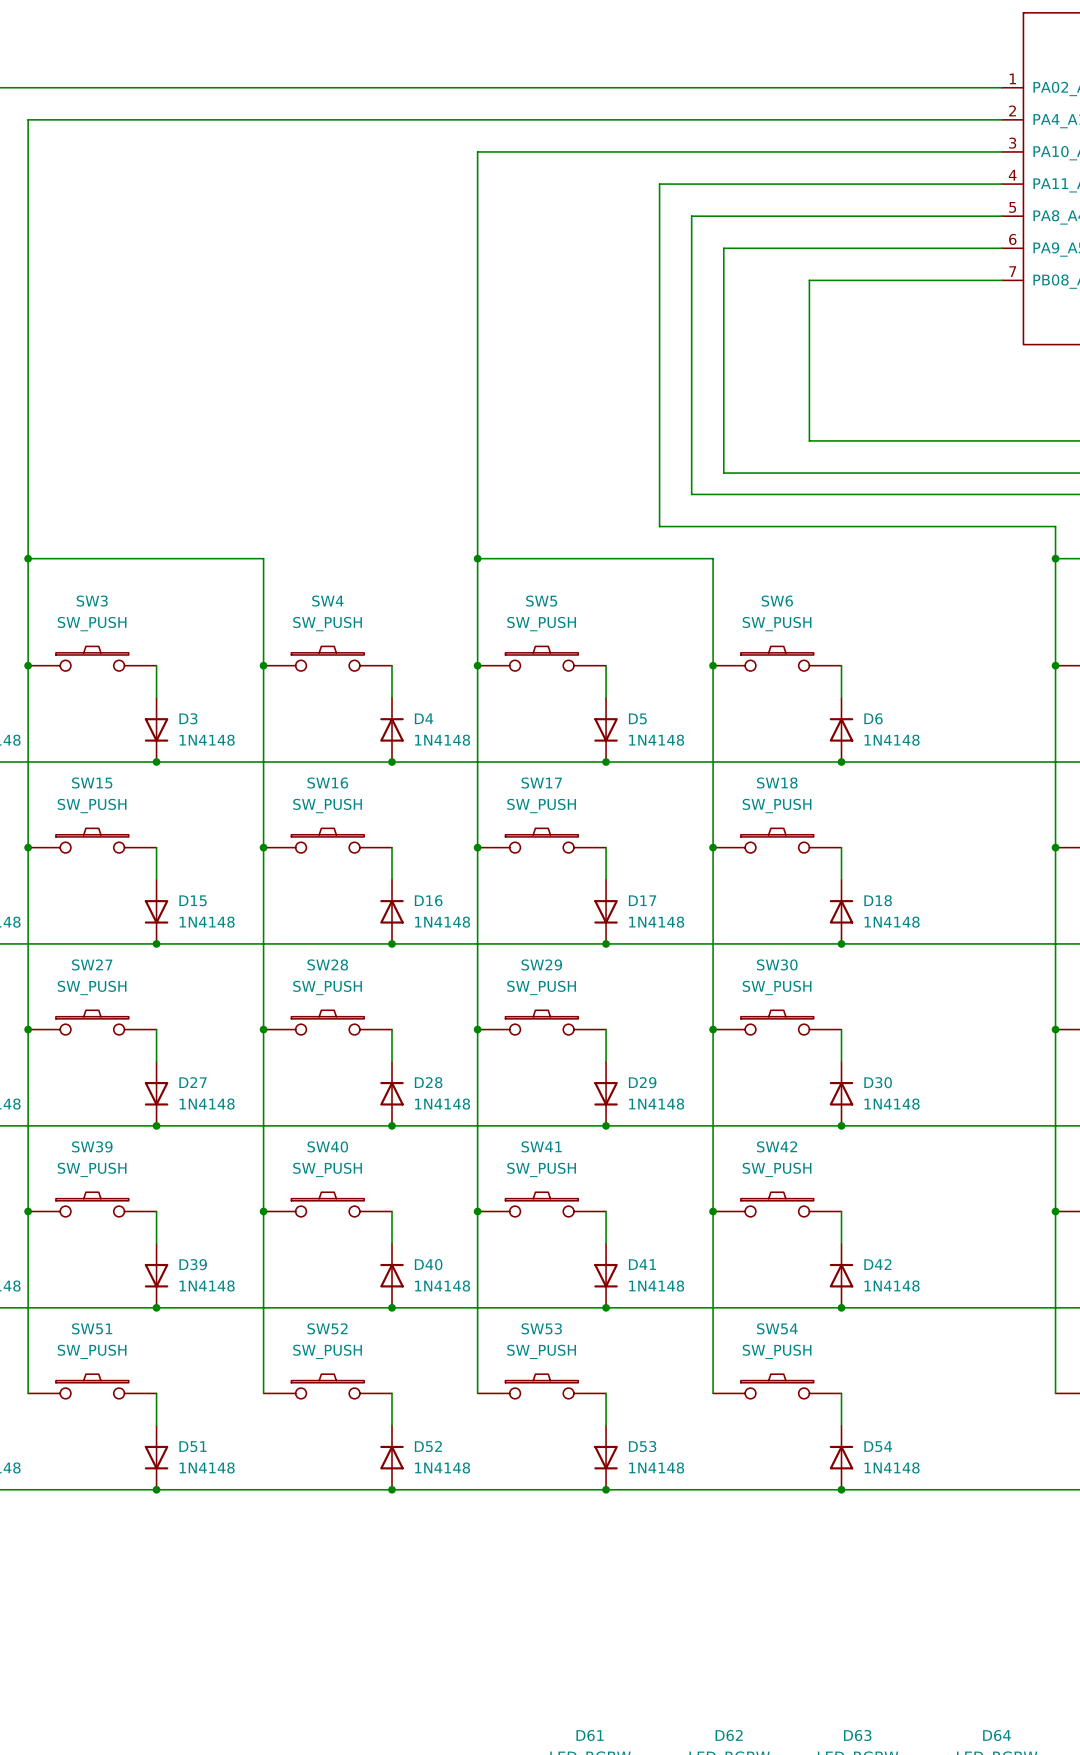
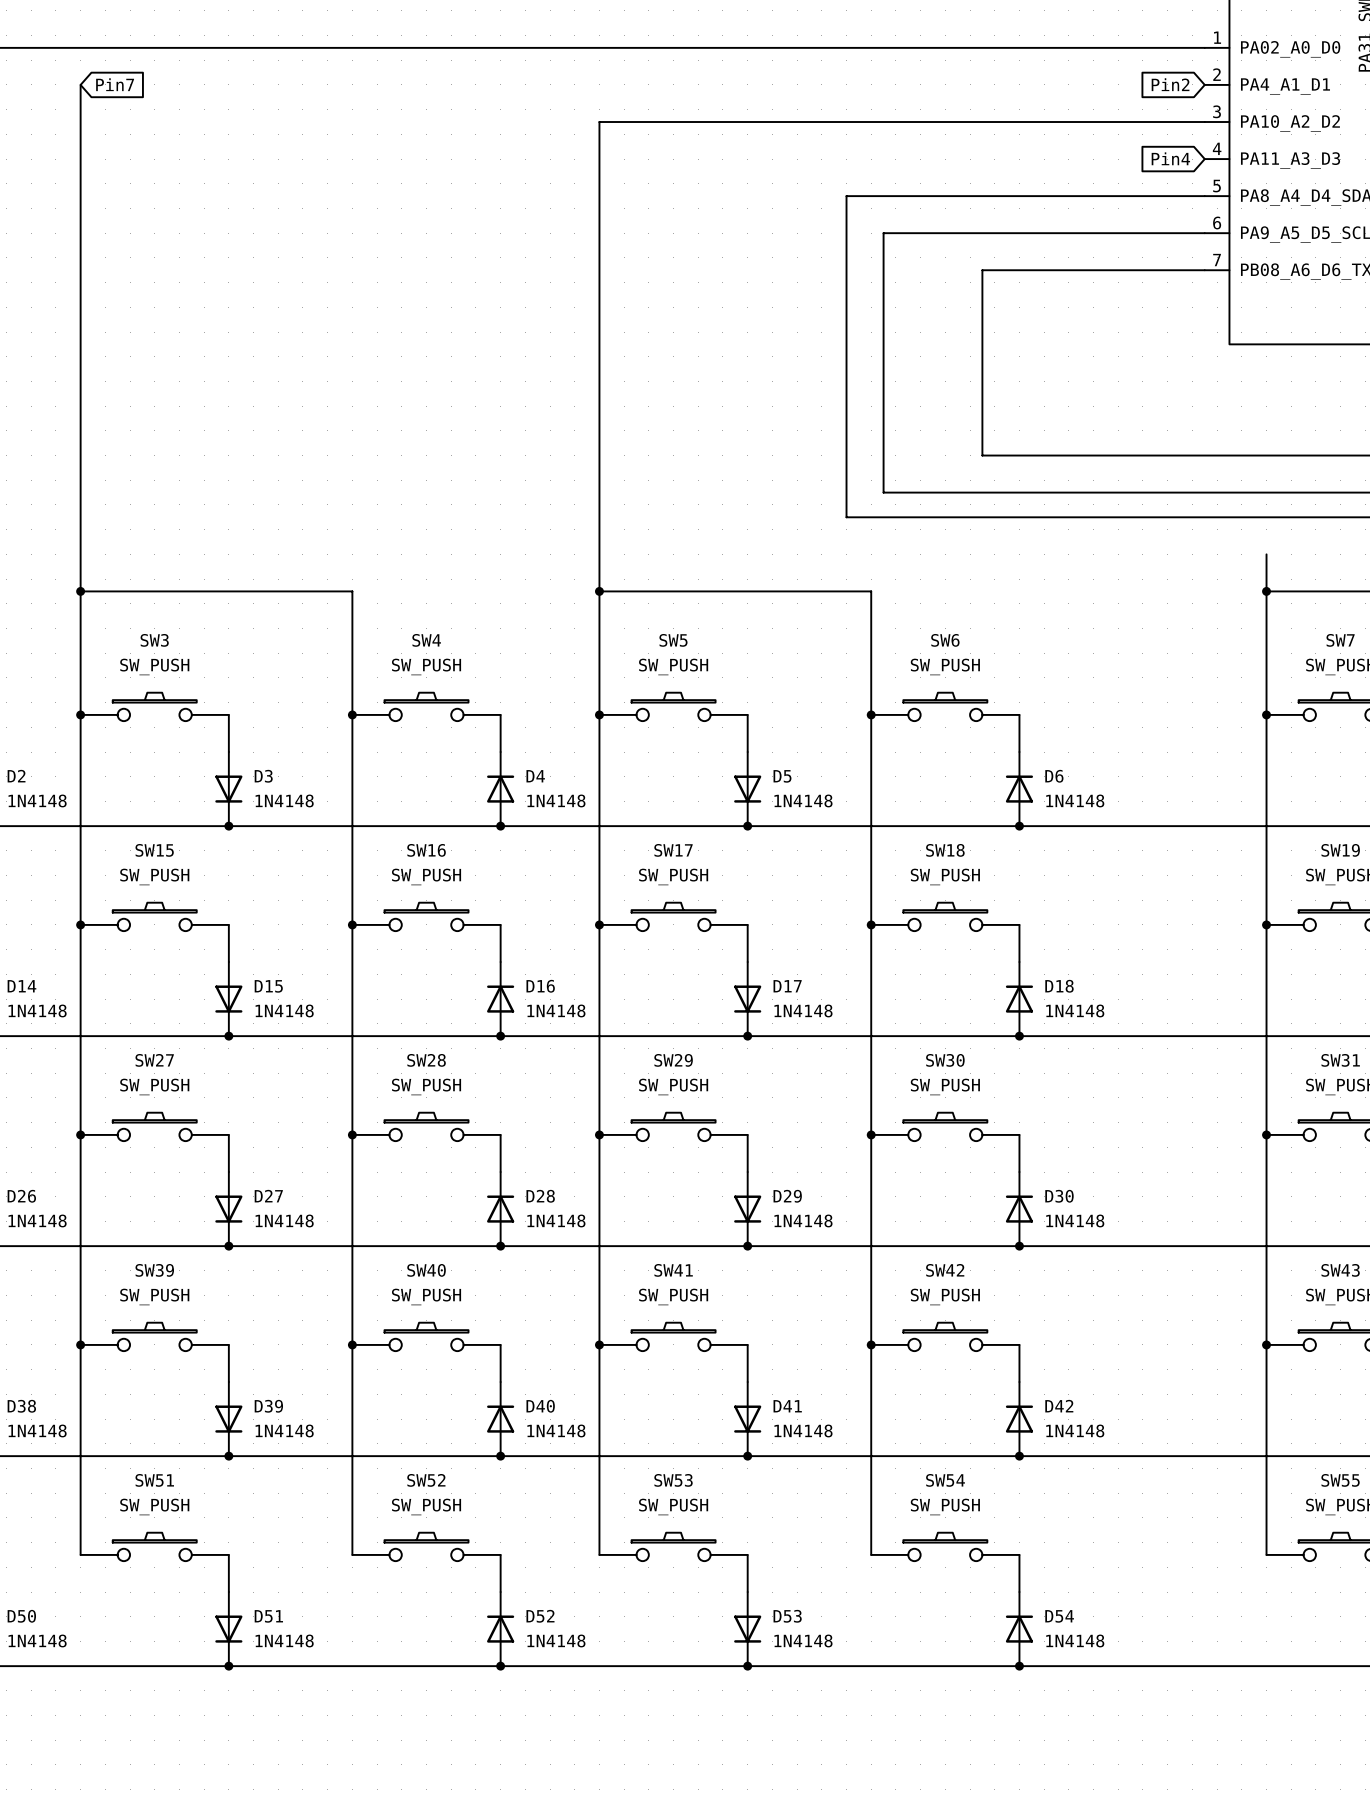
wire: (28, 119) (1002, 119) -> none
global label: none -> Pin7 (115, 84)
global label: none -> Pin2 (1170, 84)
global label: none -> Pin4 (1170, 158)
wire: (1002, 184) (659, 184) (659, 526) (1055, 526) -> none

